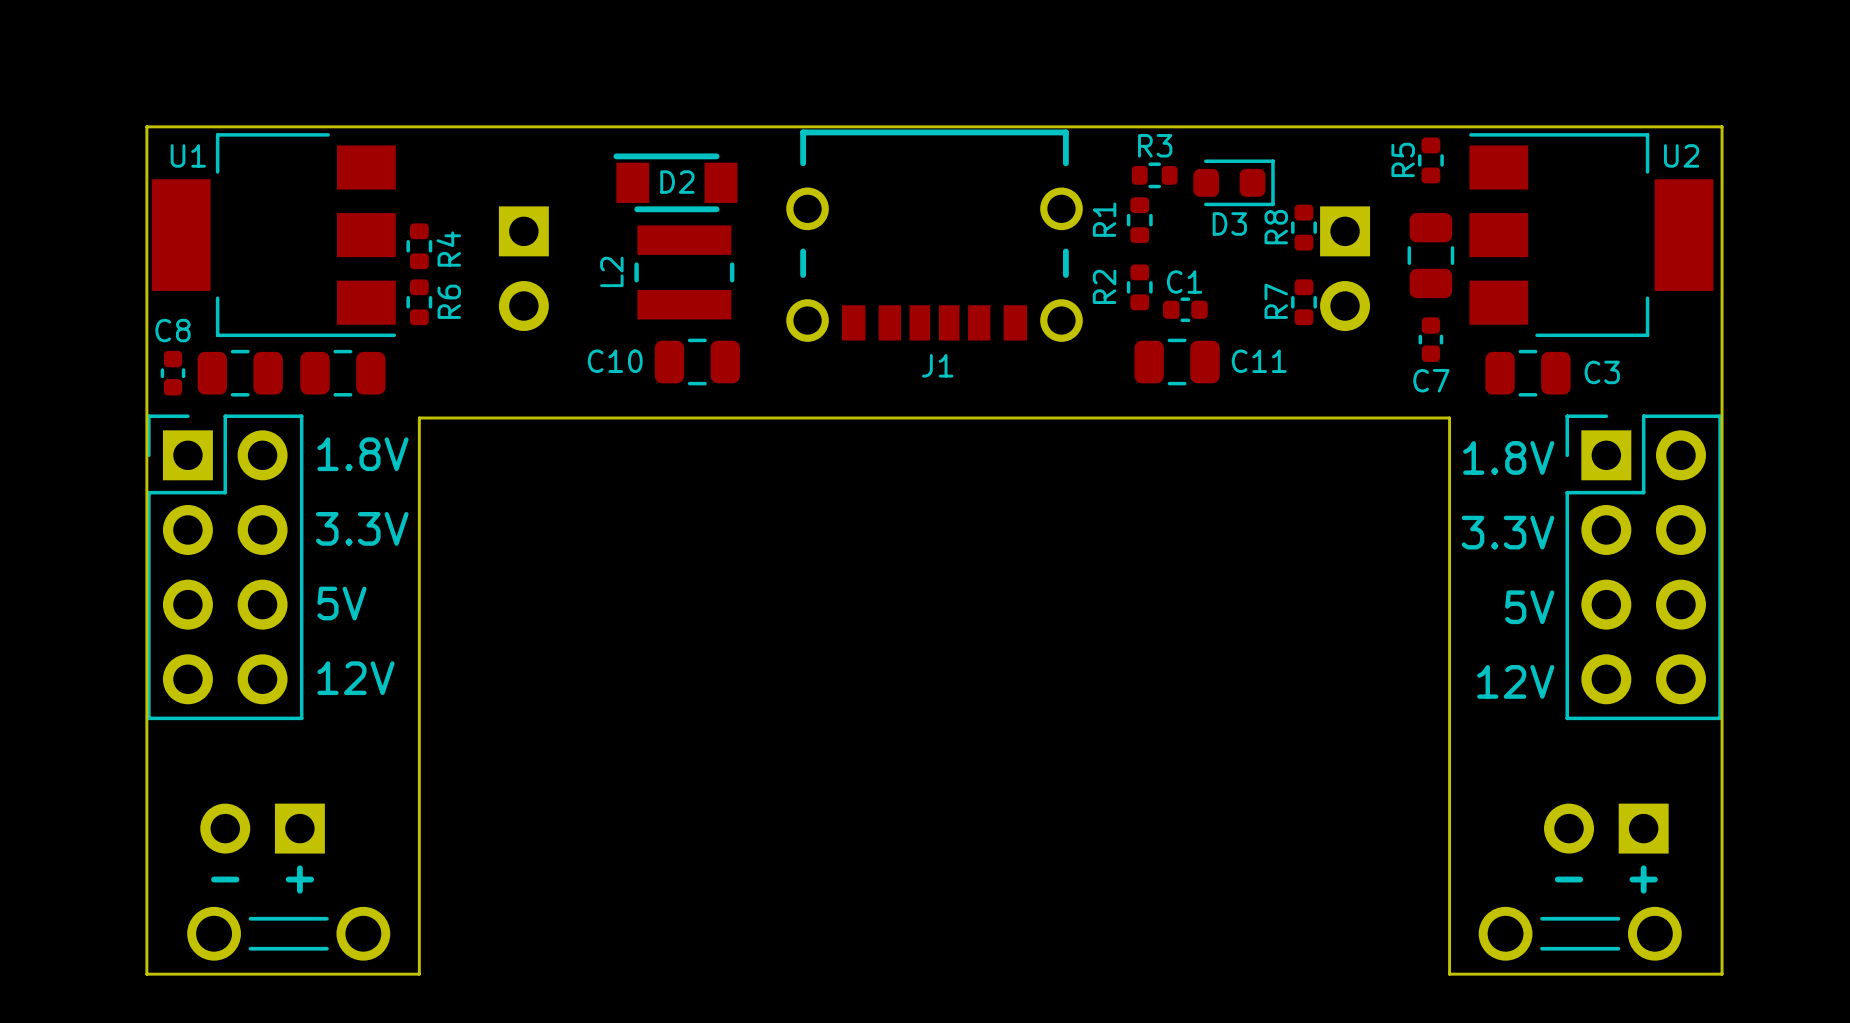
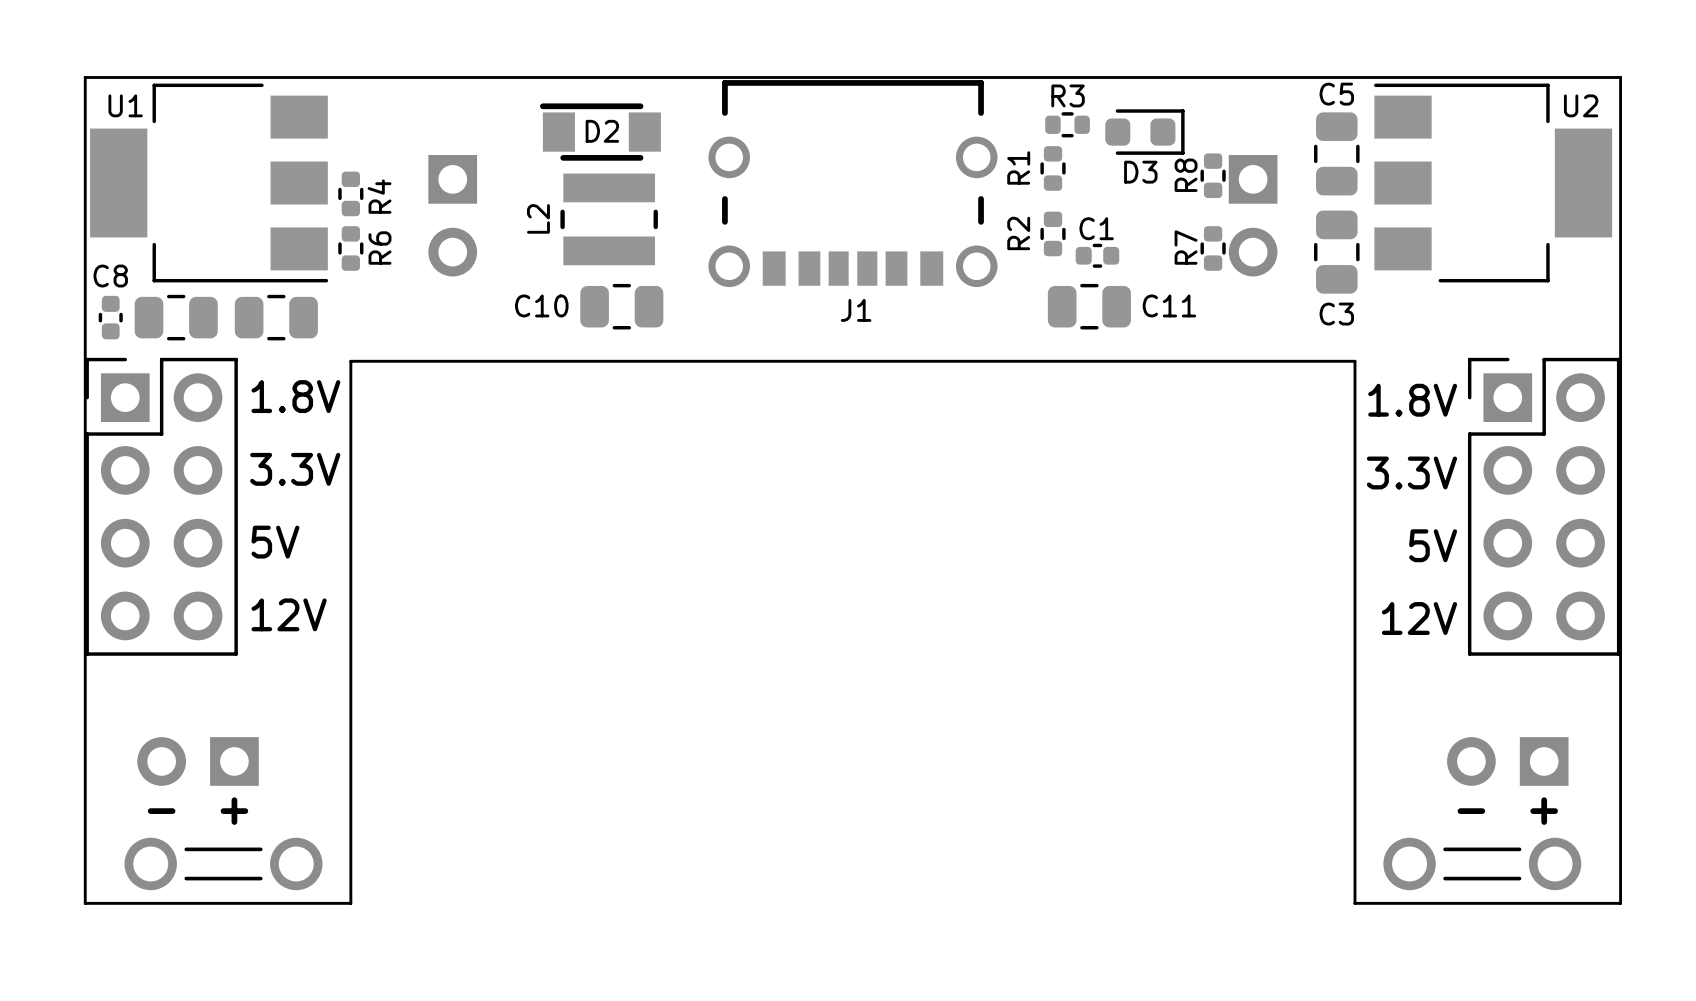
R5: (1430, 160) -> none
C5: none -> (1336, 153)
part: (1430, 255) -> none
C7: (1430, 339) -> none
C3 rotation: 0° (1527, 373) -> 90° clockwise (1336, 252)
C3 position: (1527, 373) -> (1336, 252)

